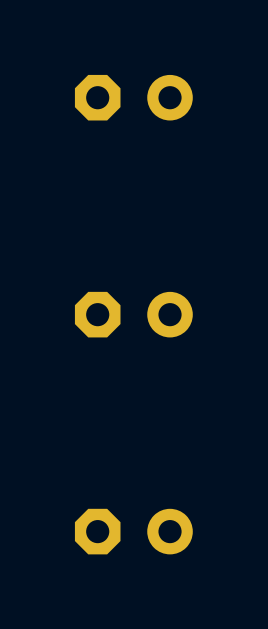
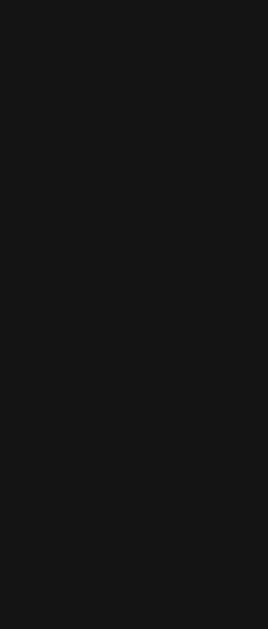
part: (133, 97) -> none
part: (133, 314) -> none
part: (133, 531) -> none

